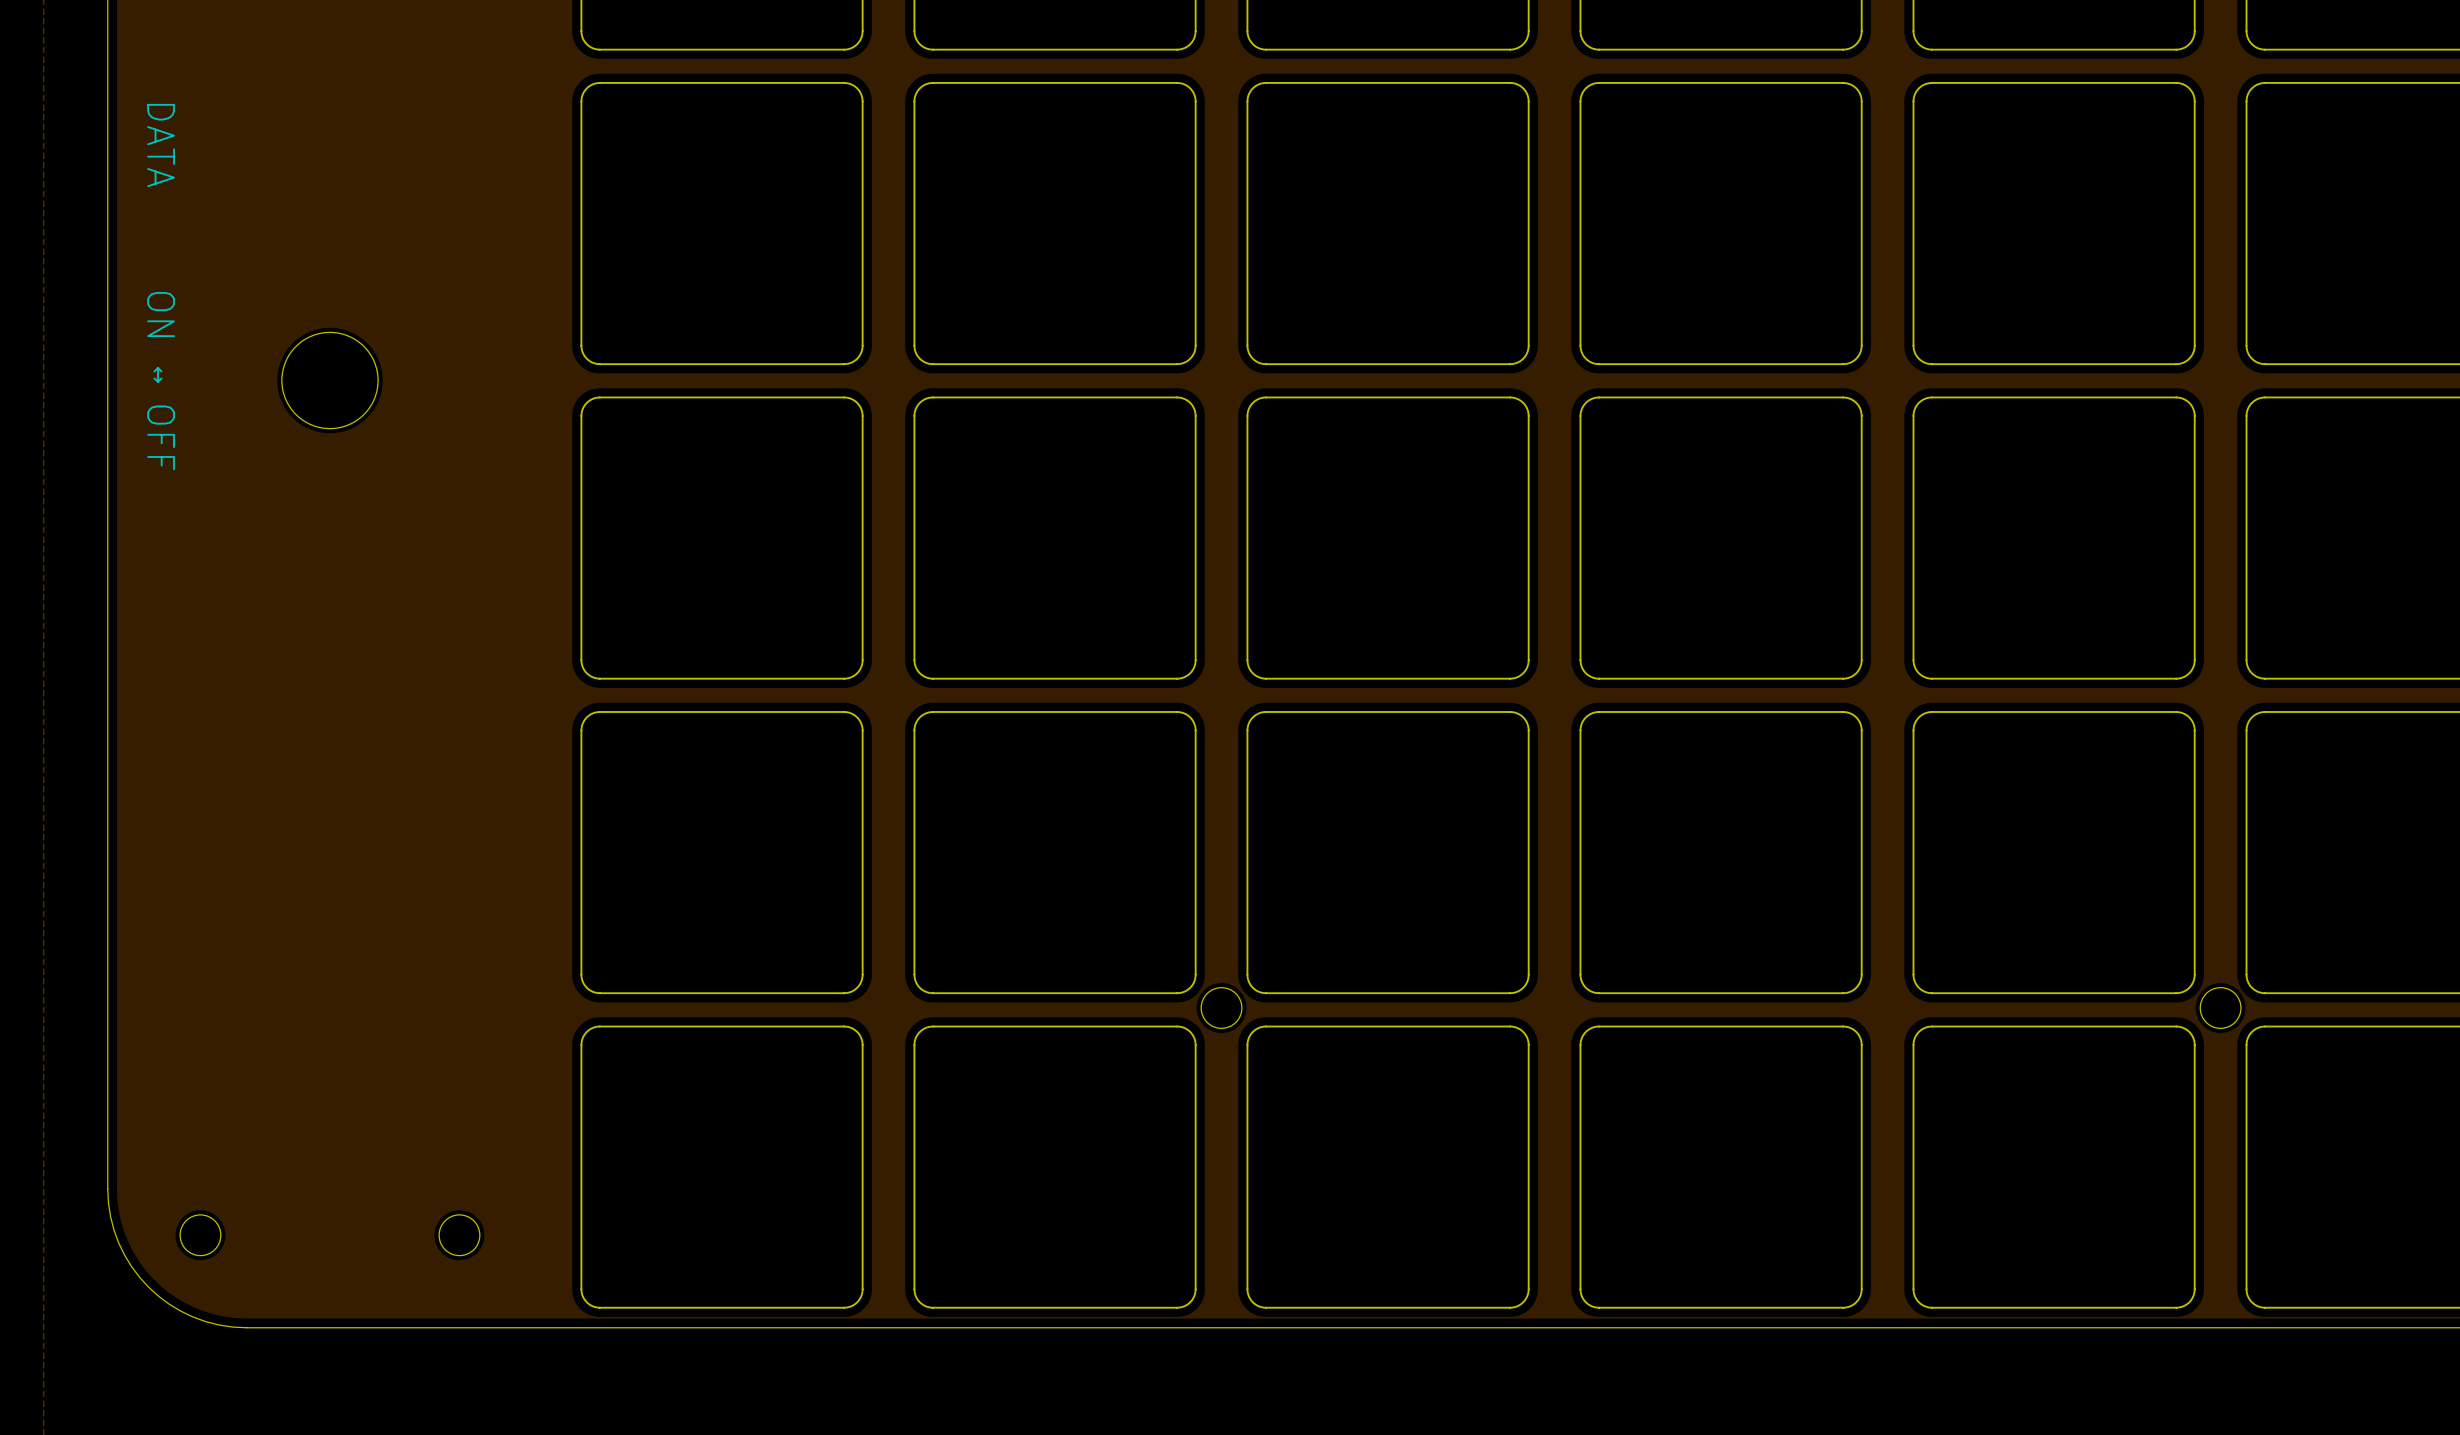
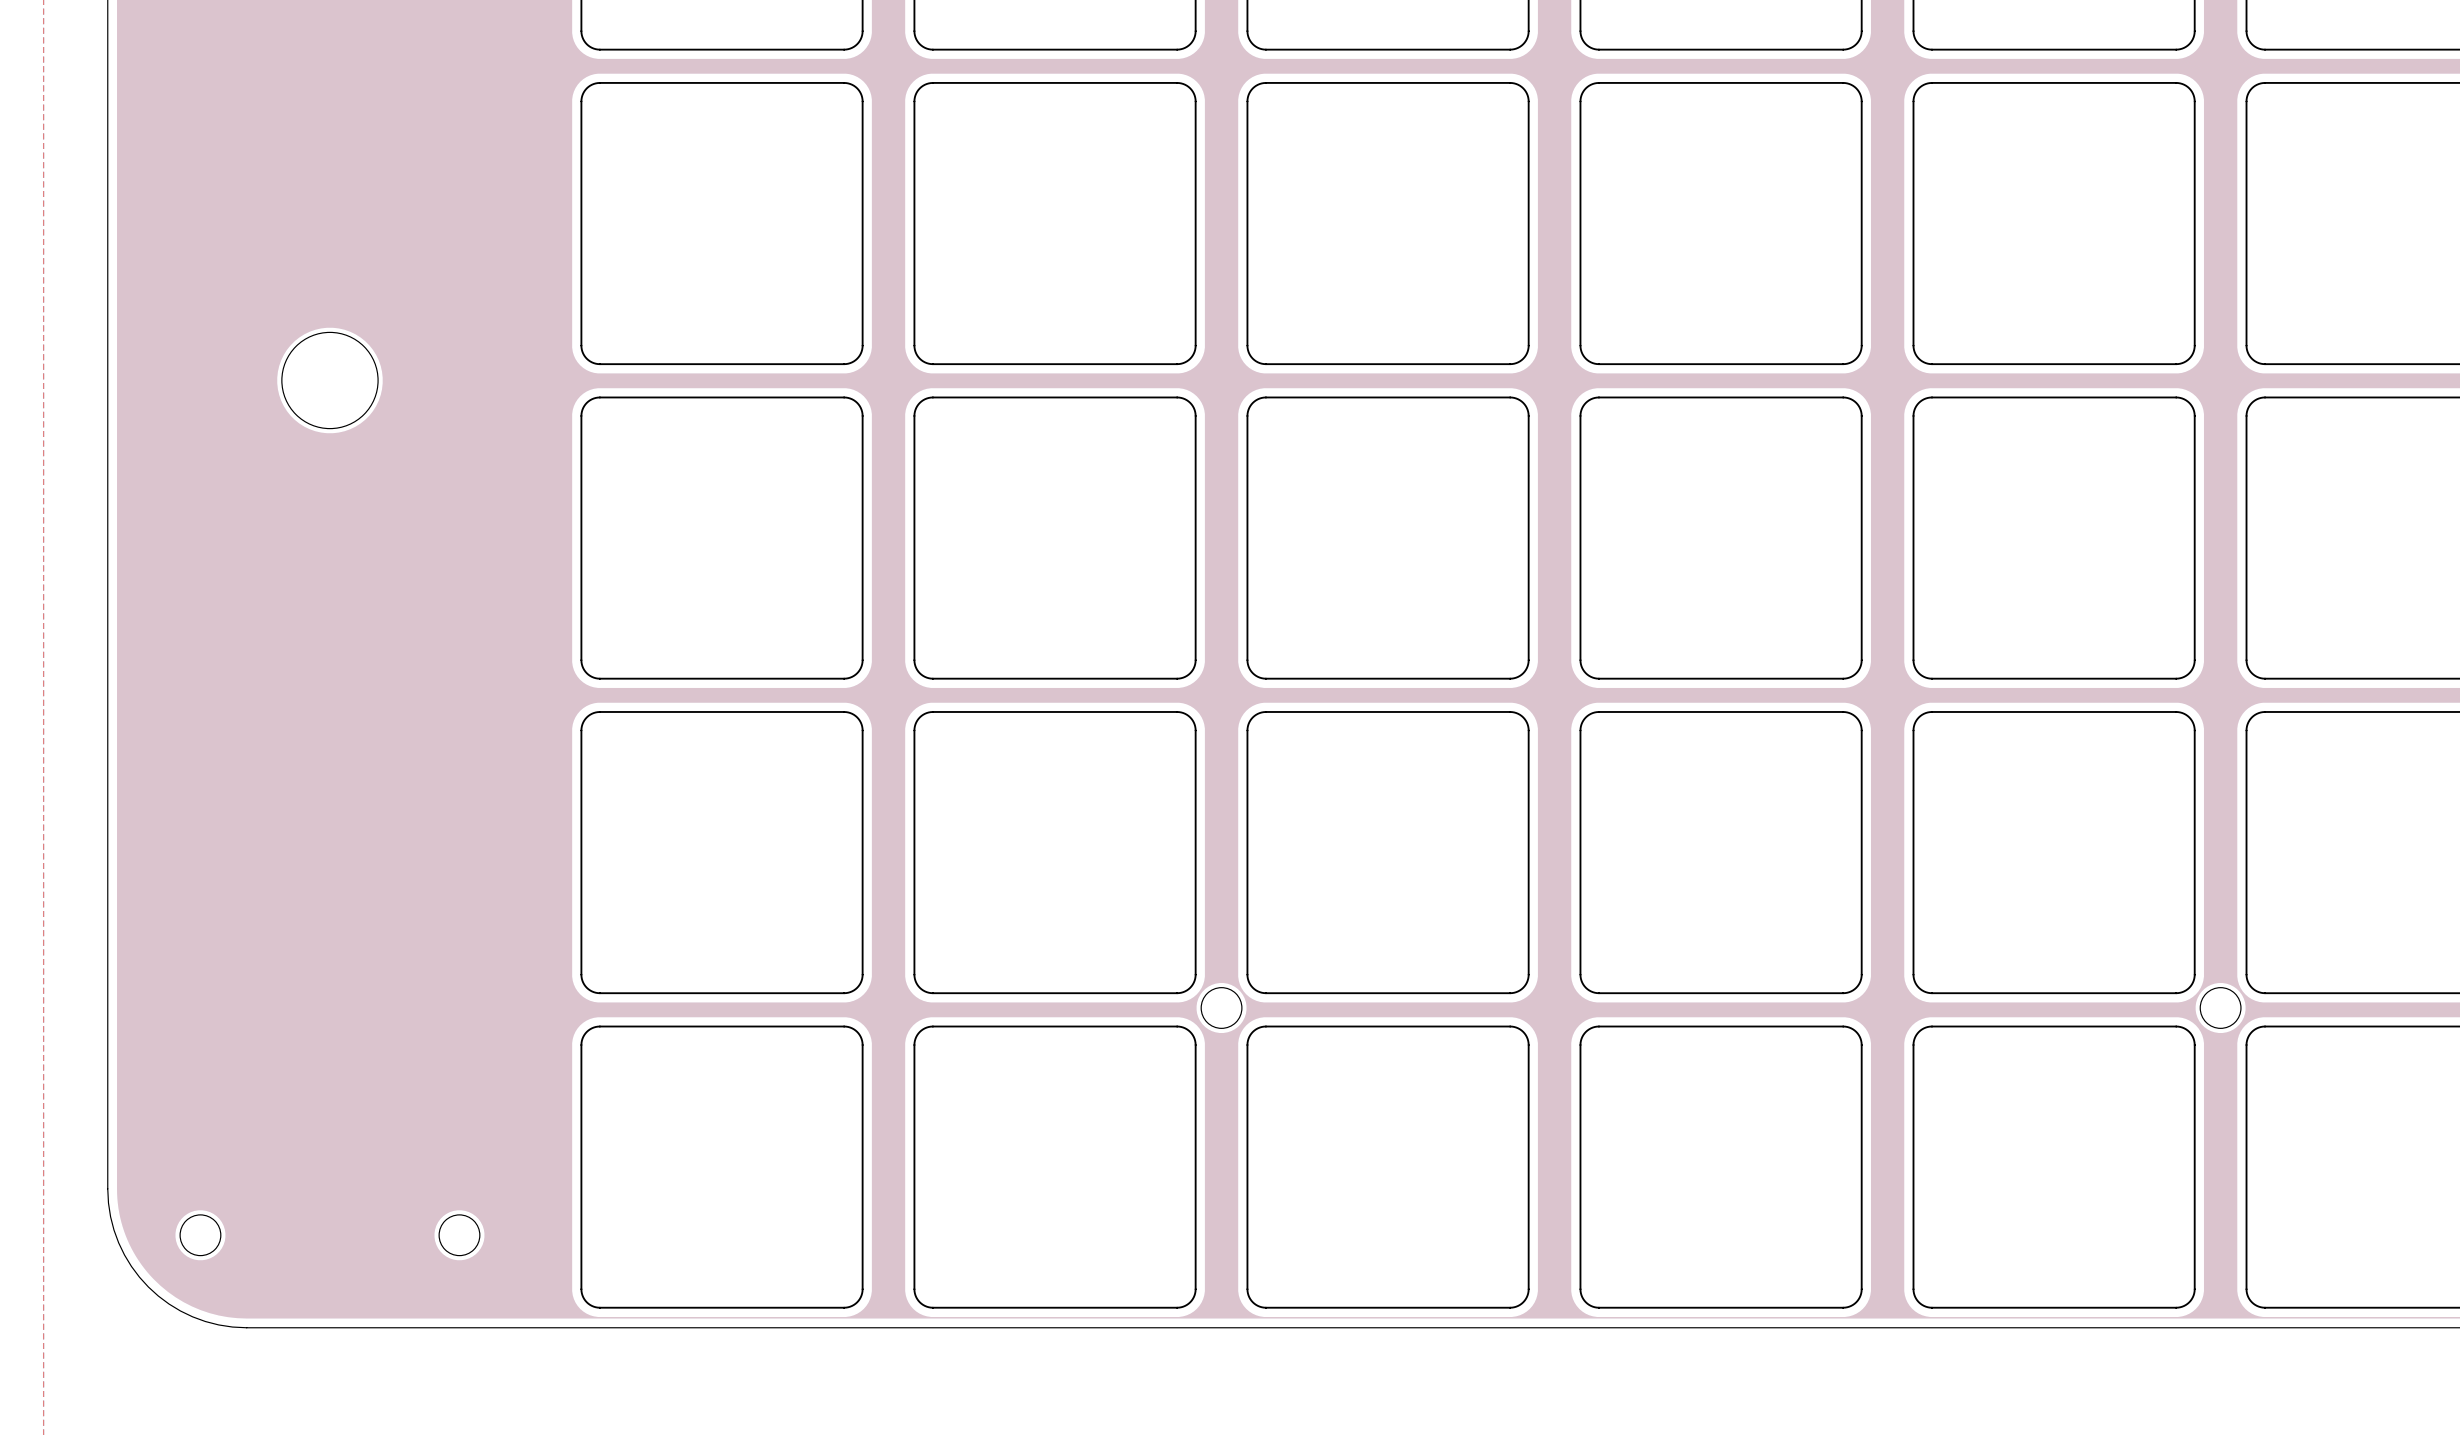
text: DATA (161, 145) -> none
text: ↔ (157, 374) -> none
text: ON OFF (161, 381) -> none

